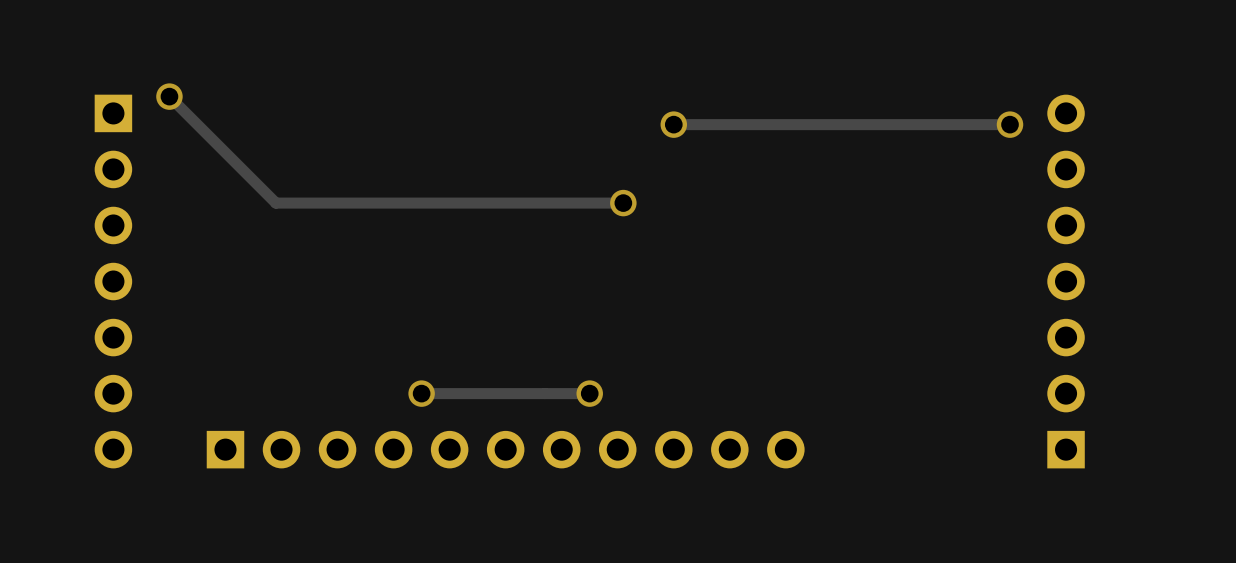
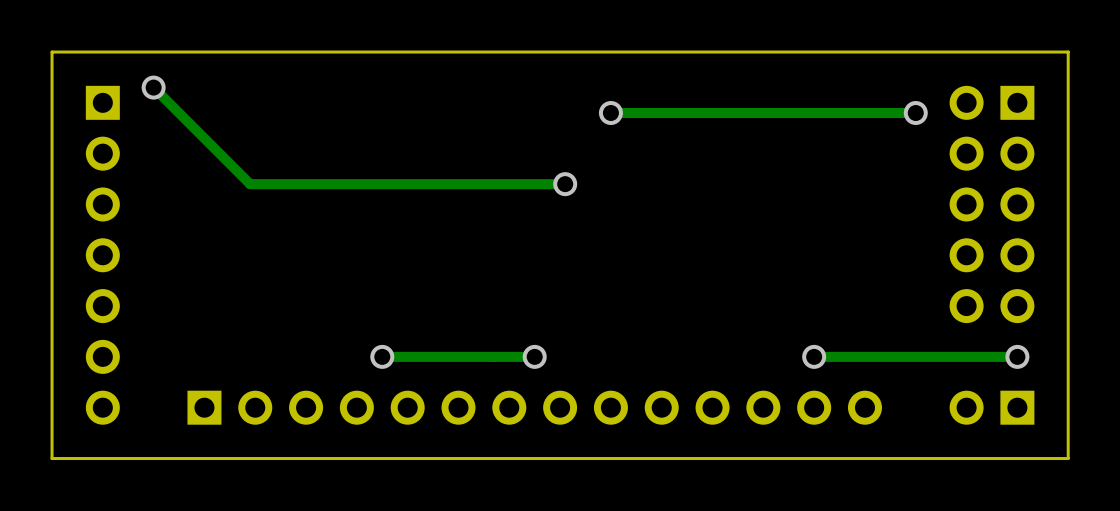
board edge: none -> (1068, 52) (1068, 458) (52, 458) (52, 52) (1068, 52)
part: none -> (992, 204)
part: (1066, 281) -> none
via: none -> (814, 356)
track: none -> (1017, 356) (814, 356)
via: none -> (1017, 356)
part: none -> (534, 407)
part: none -> (992, 407)

